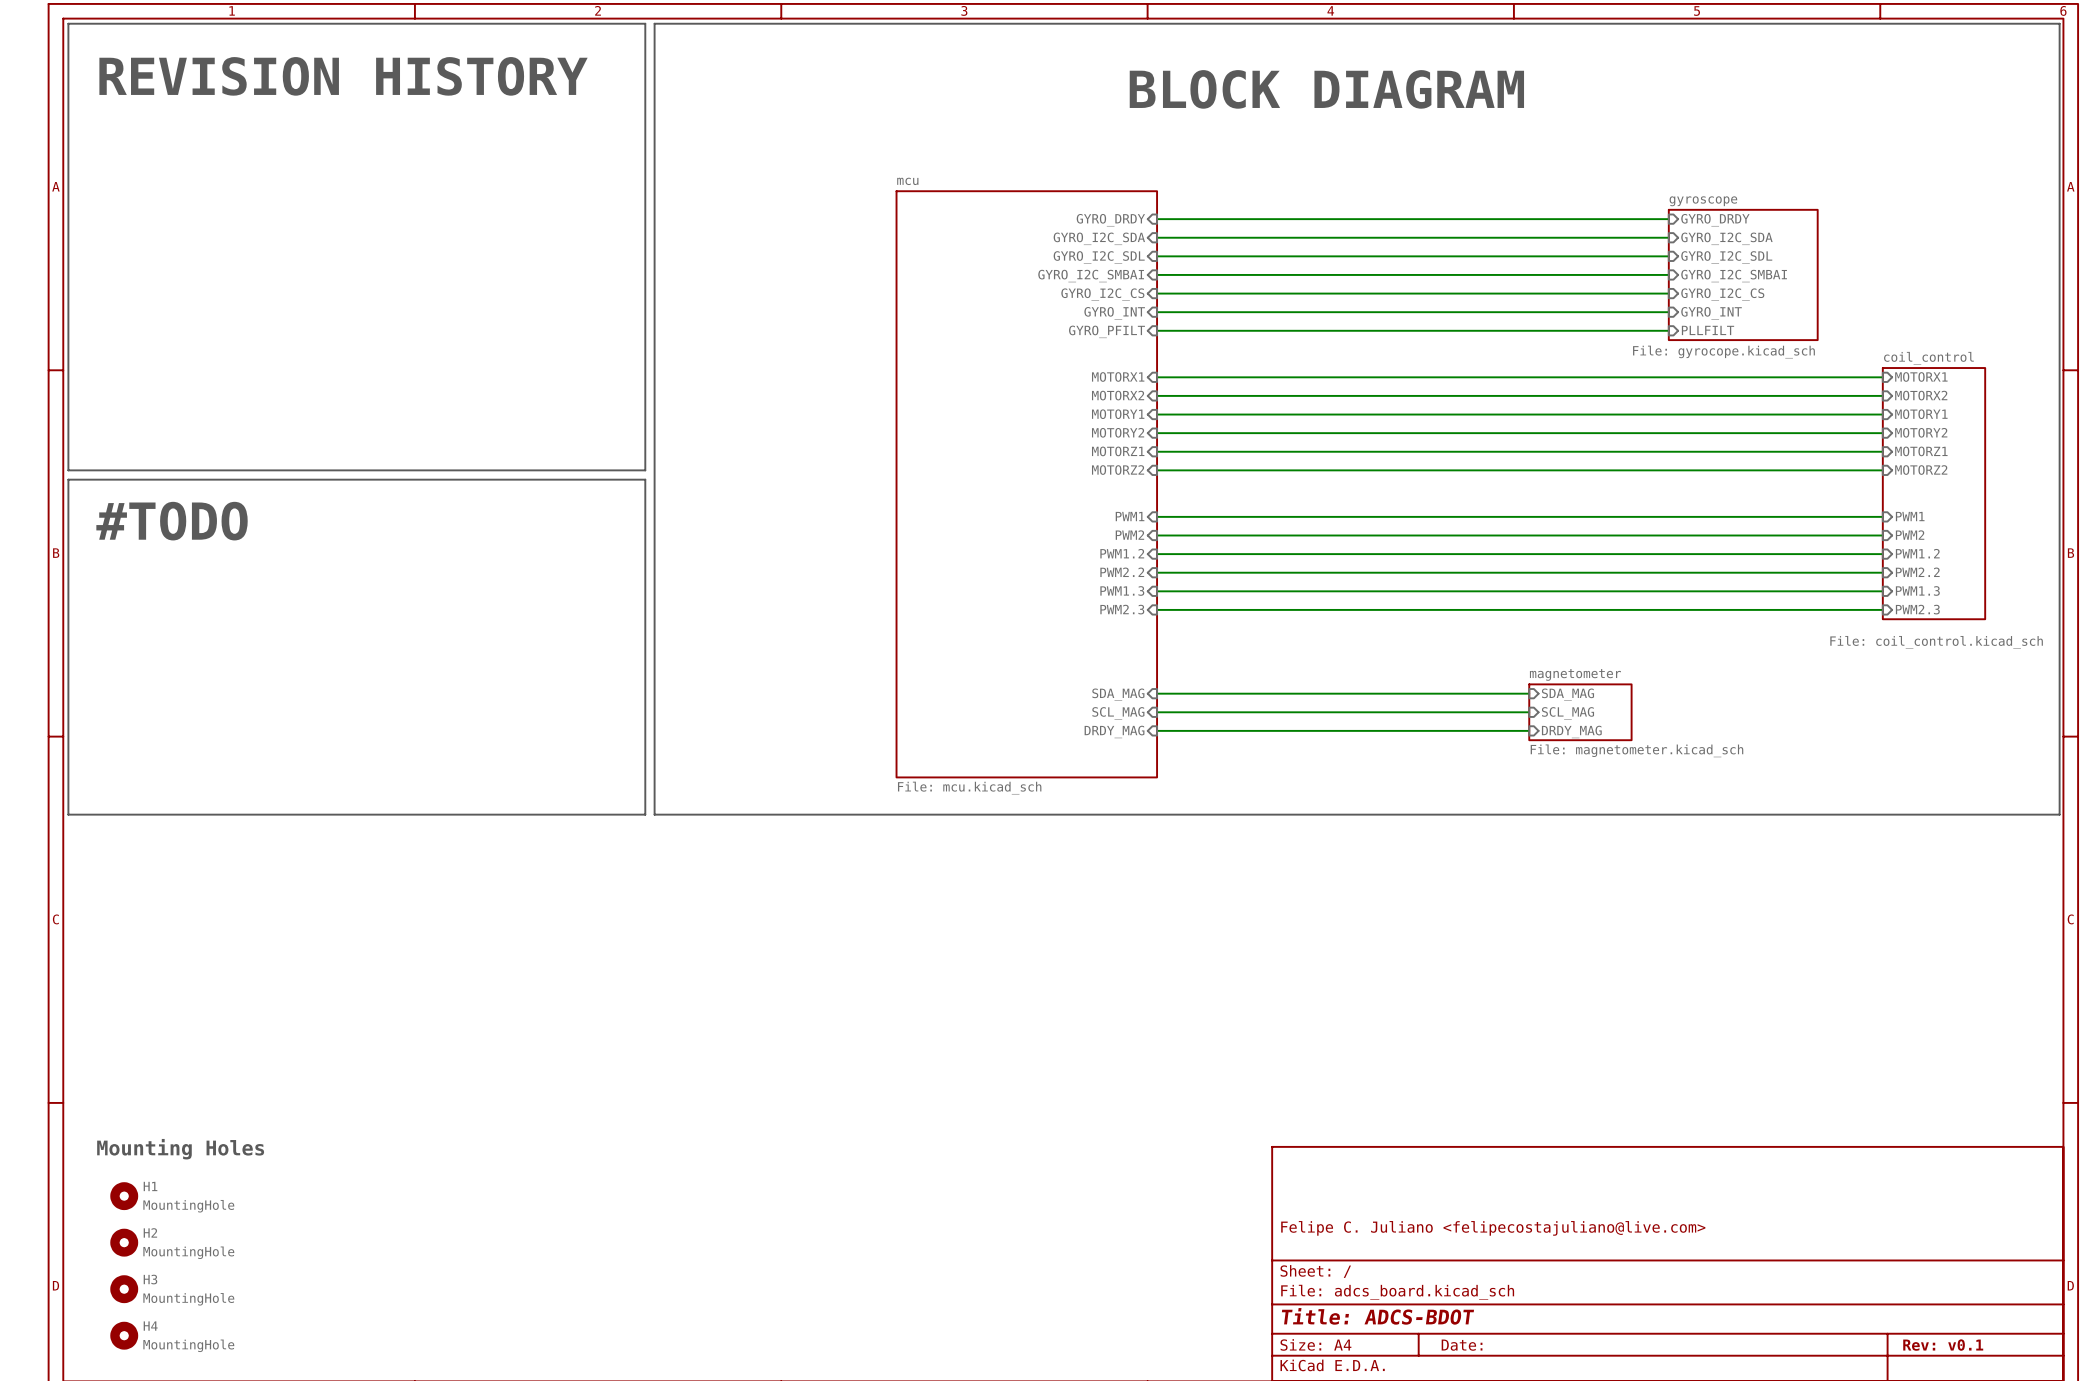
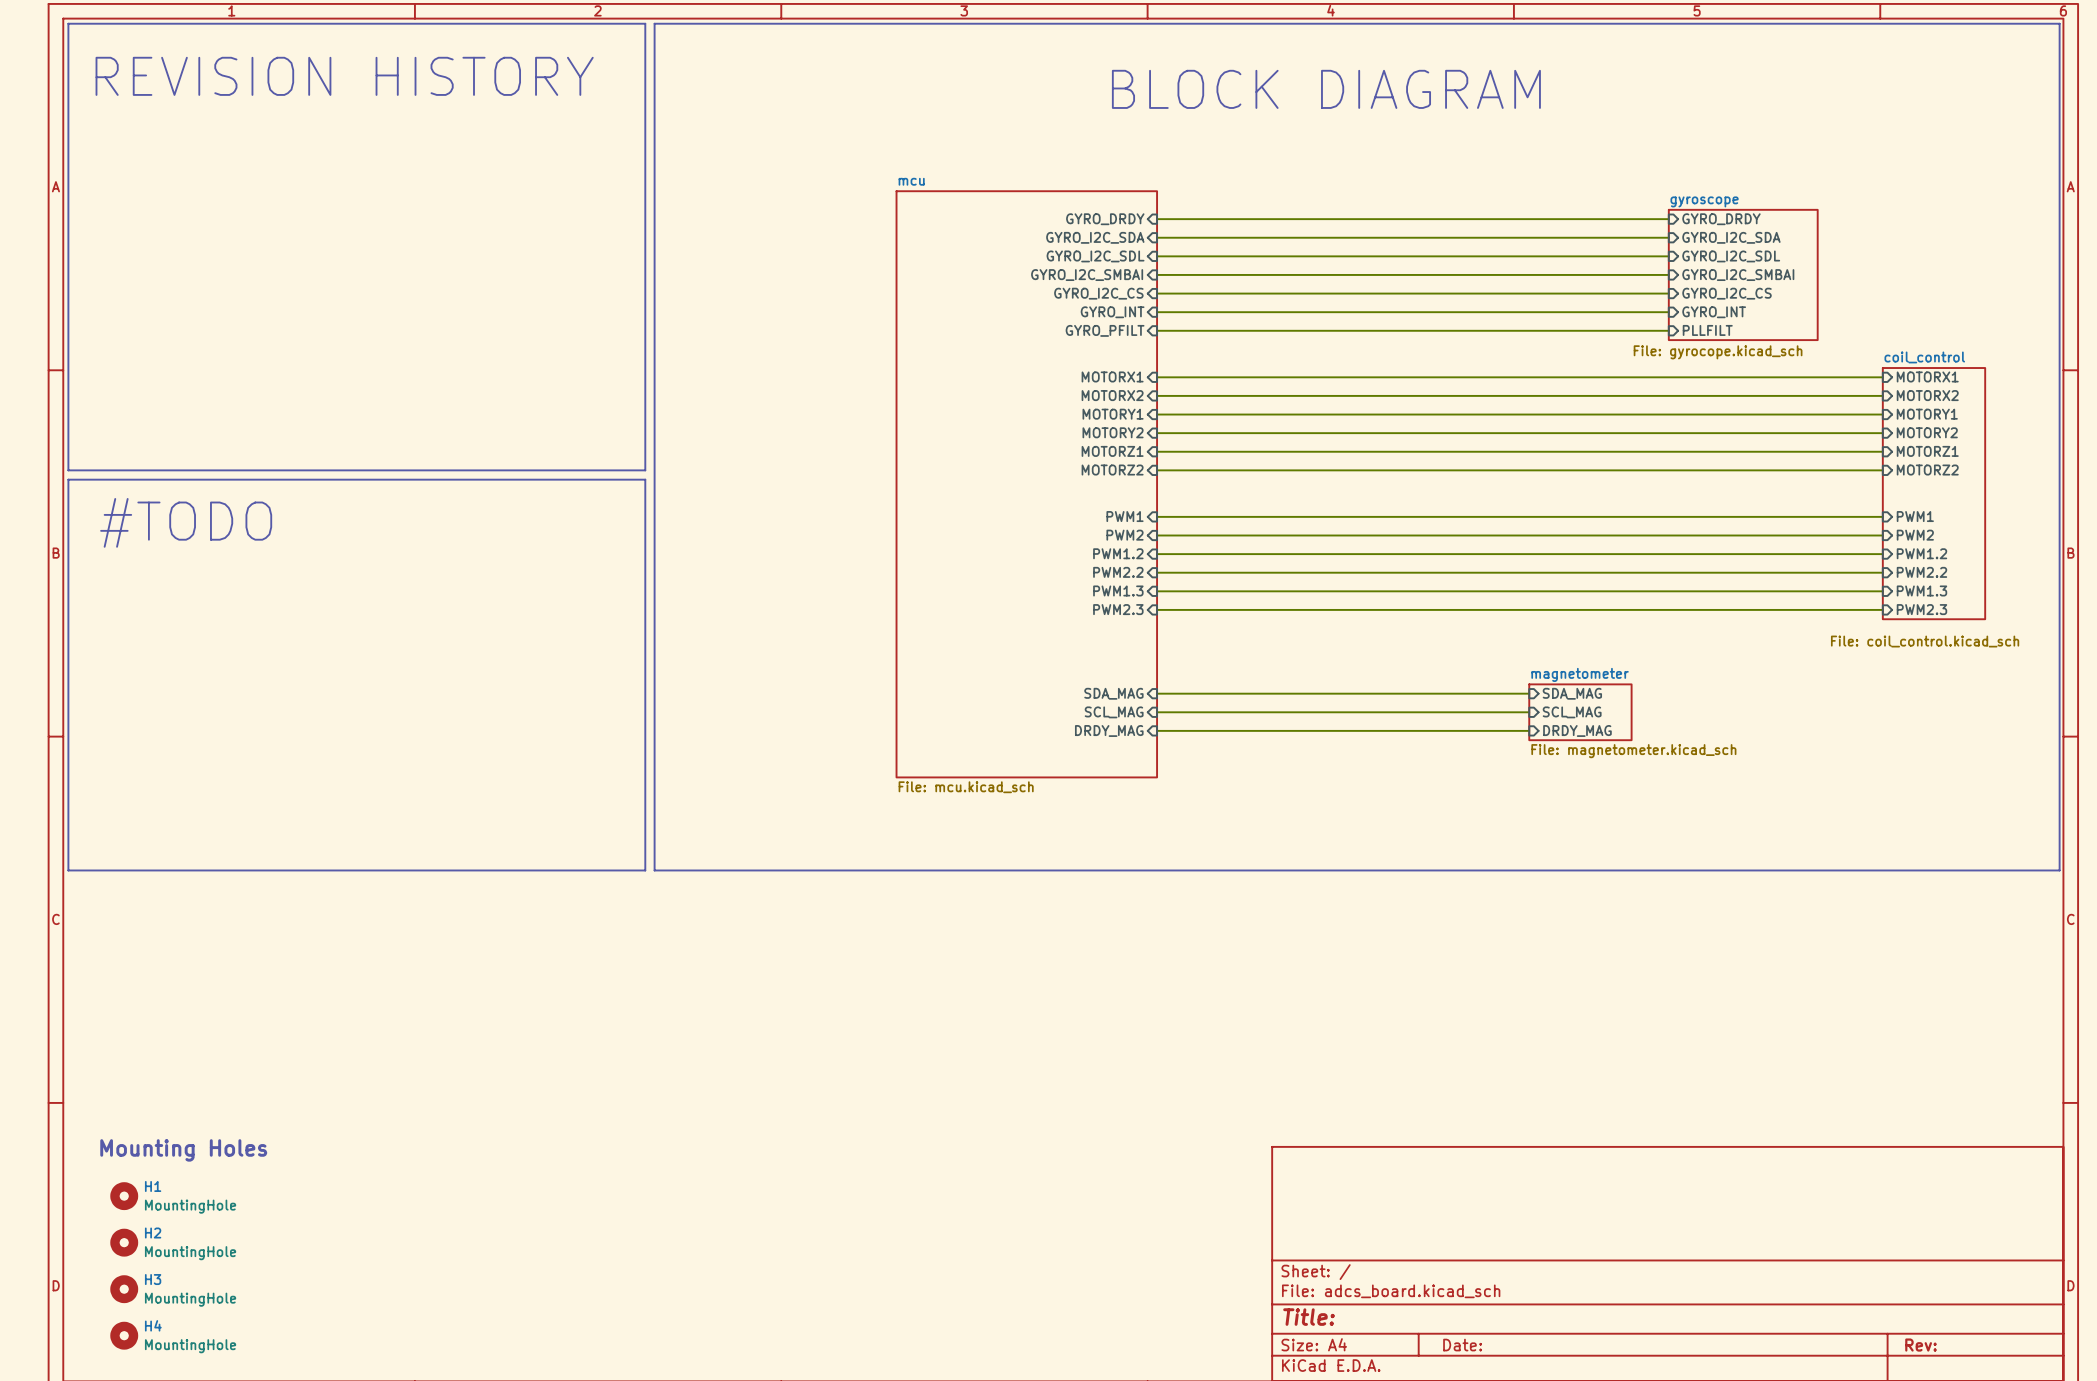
line: (68, 814) (645, 814) -> (68, 814) (68, 870) (645, 870) (645, 814)
line: (654, 814) (2059, 814) -> (654, 814) (654, 870) (2059, 870) (2059, 814)
title block: Felipe C. Juliano <felipecostajuliano@live.com> (1493, 1228) -> none
title block: Title: ADCS-BDOT (1377, 1316) -> Title: (1309, 1317)
title block: Rev: v0.1 (1943, 1345) -> Rev: (1920, 1345)

